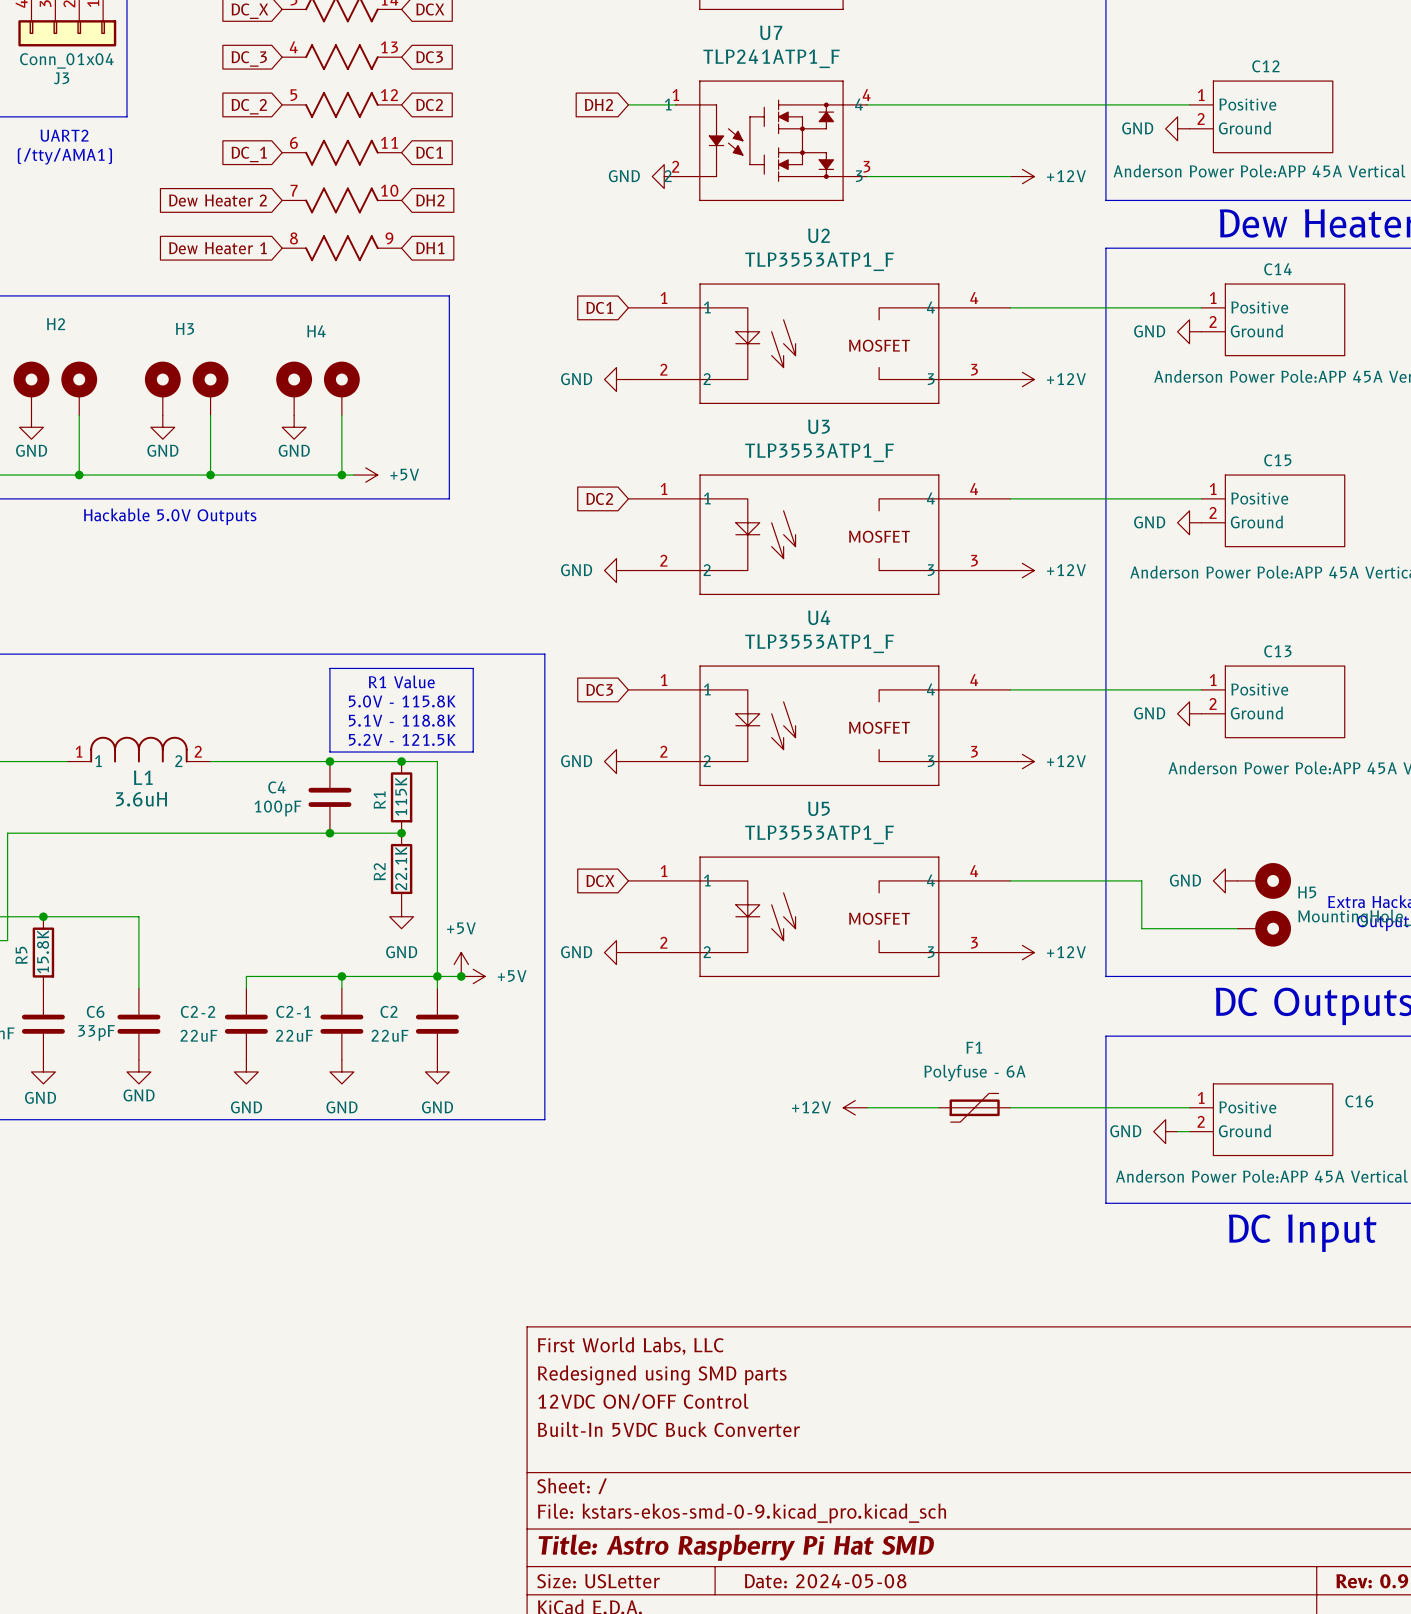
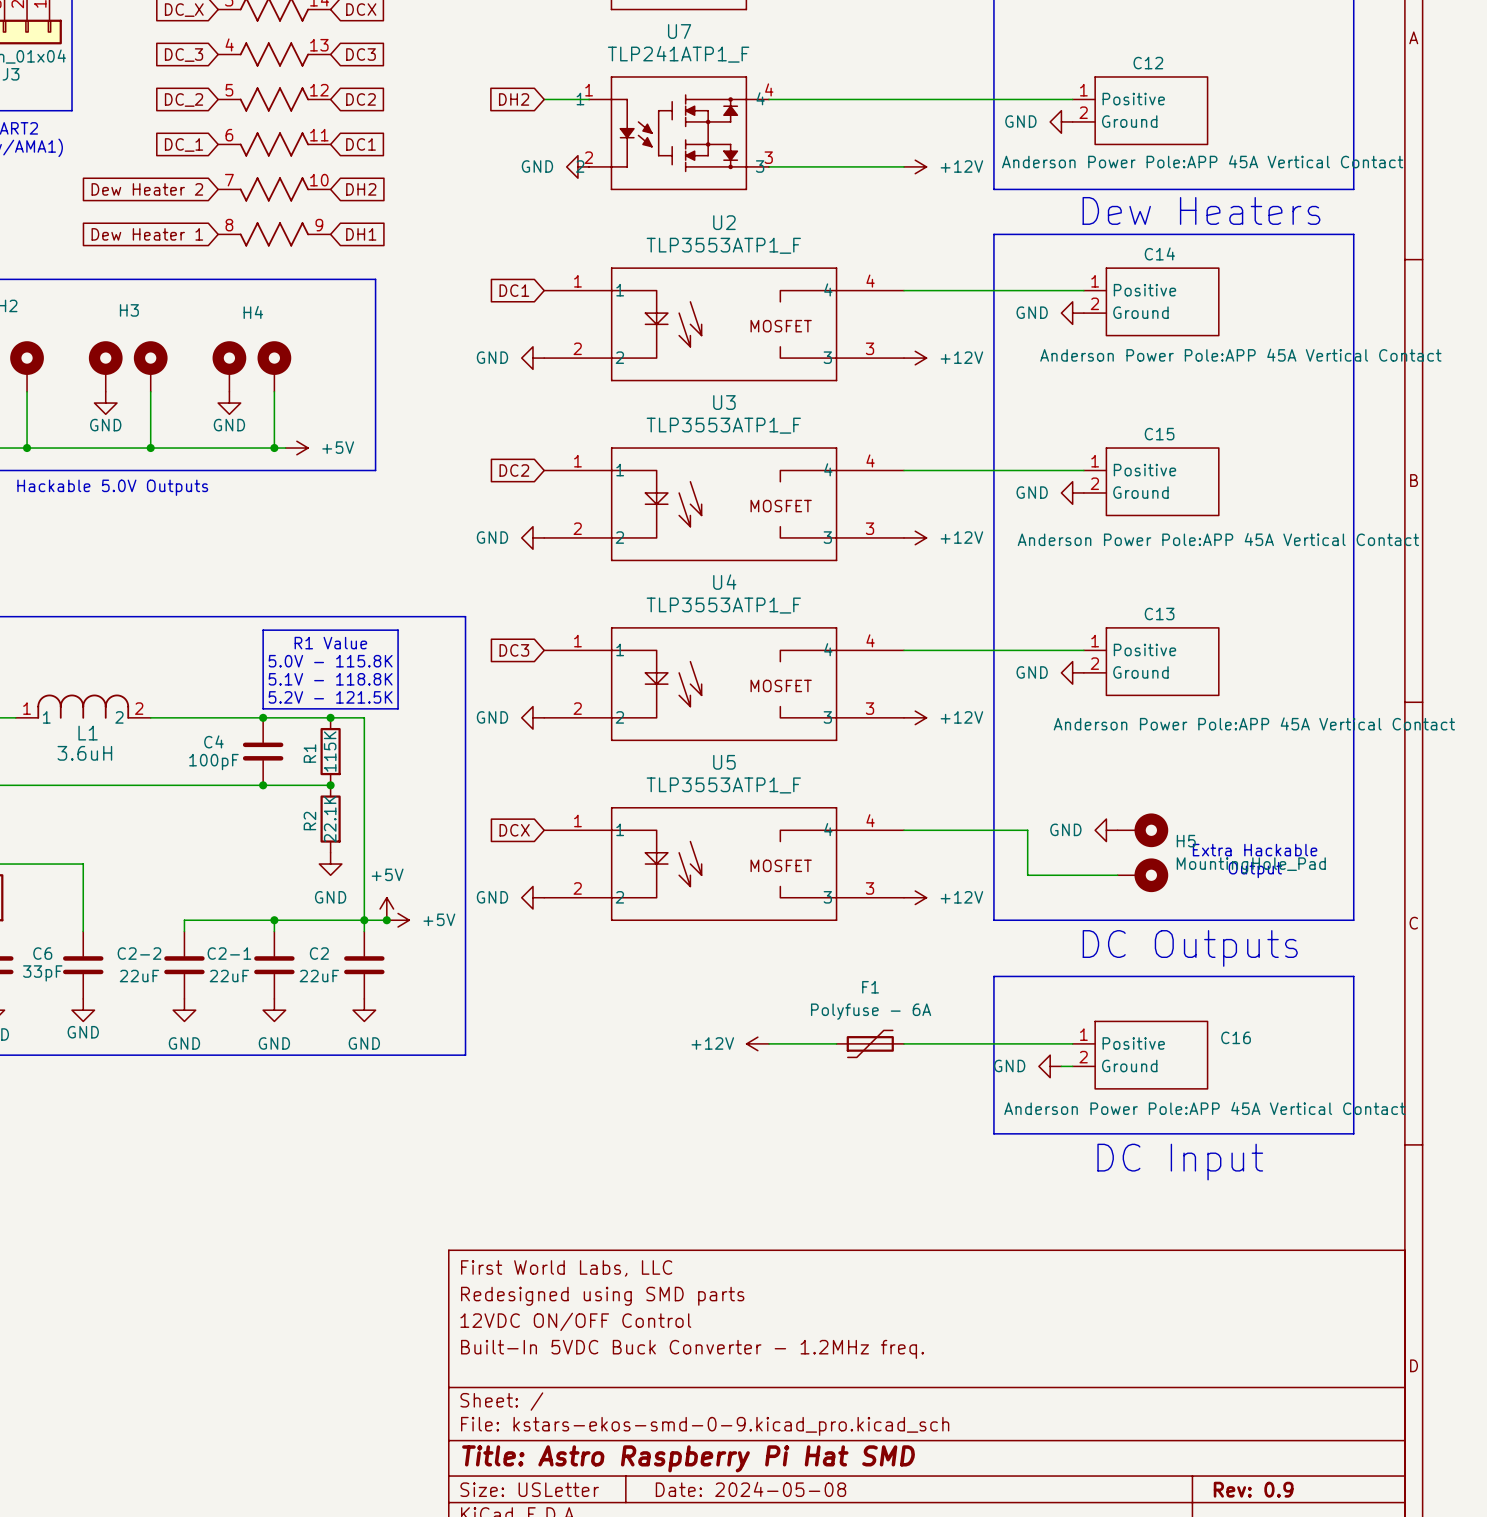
title block: Built-In 5VDC Buck Converter (668, 1429) -> Built-In 5VDC Buck Converter - 1.2MHz freq. (692, 1349)

